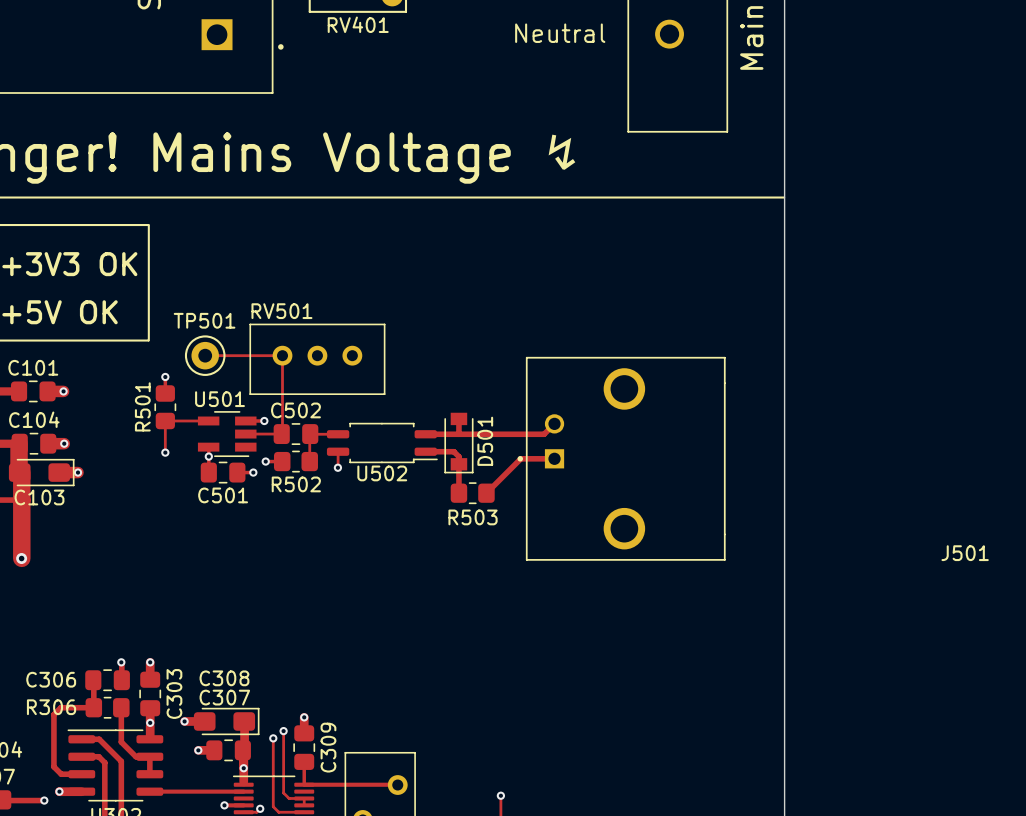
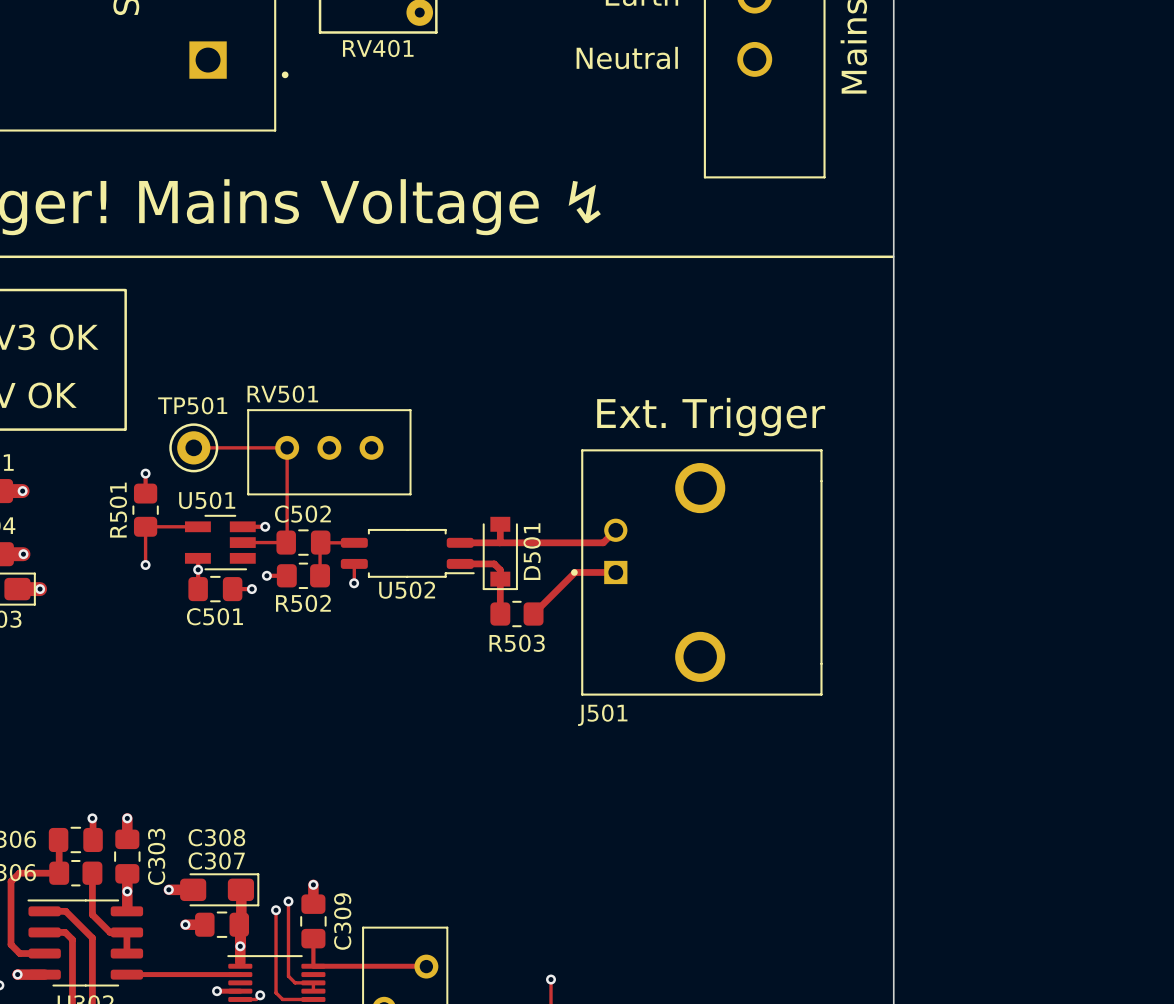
text: none -> Ext. Trigger (711, 417)
J501 name position: J501 (965, 553) -> J501 (602, 715)

